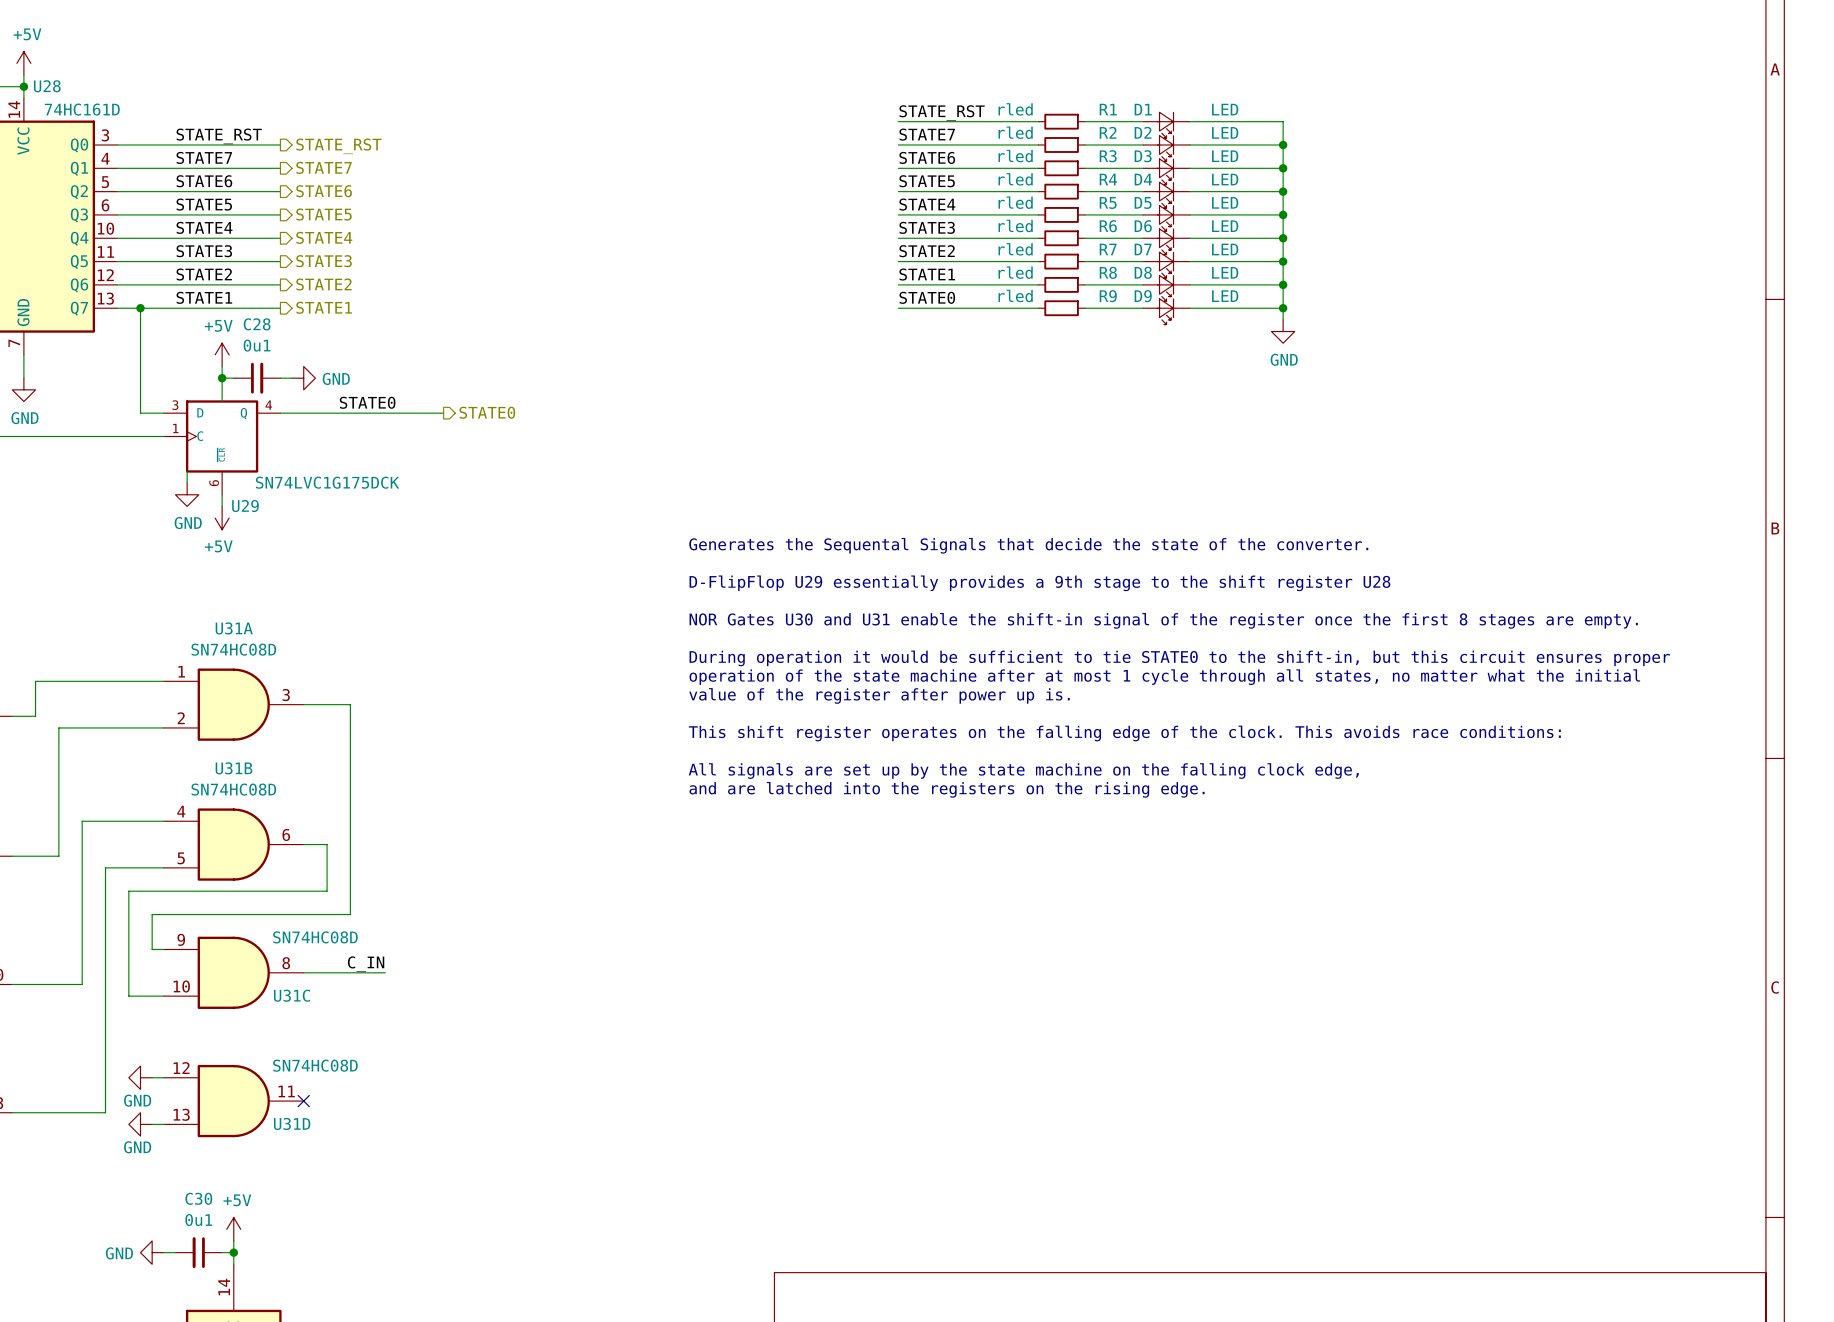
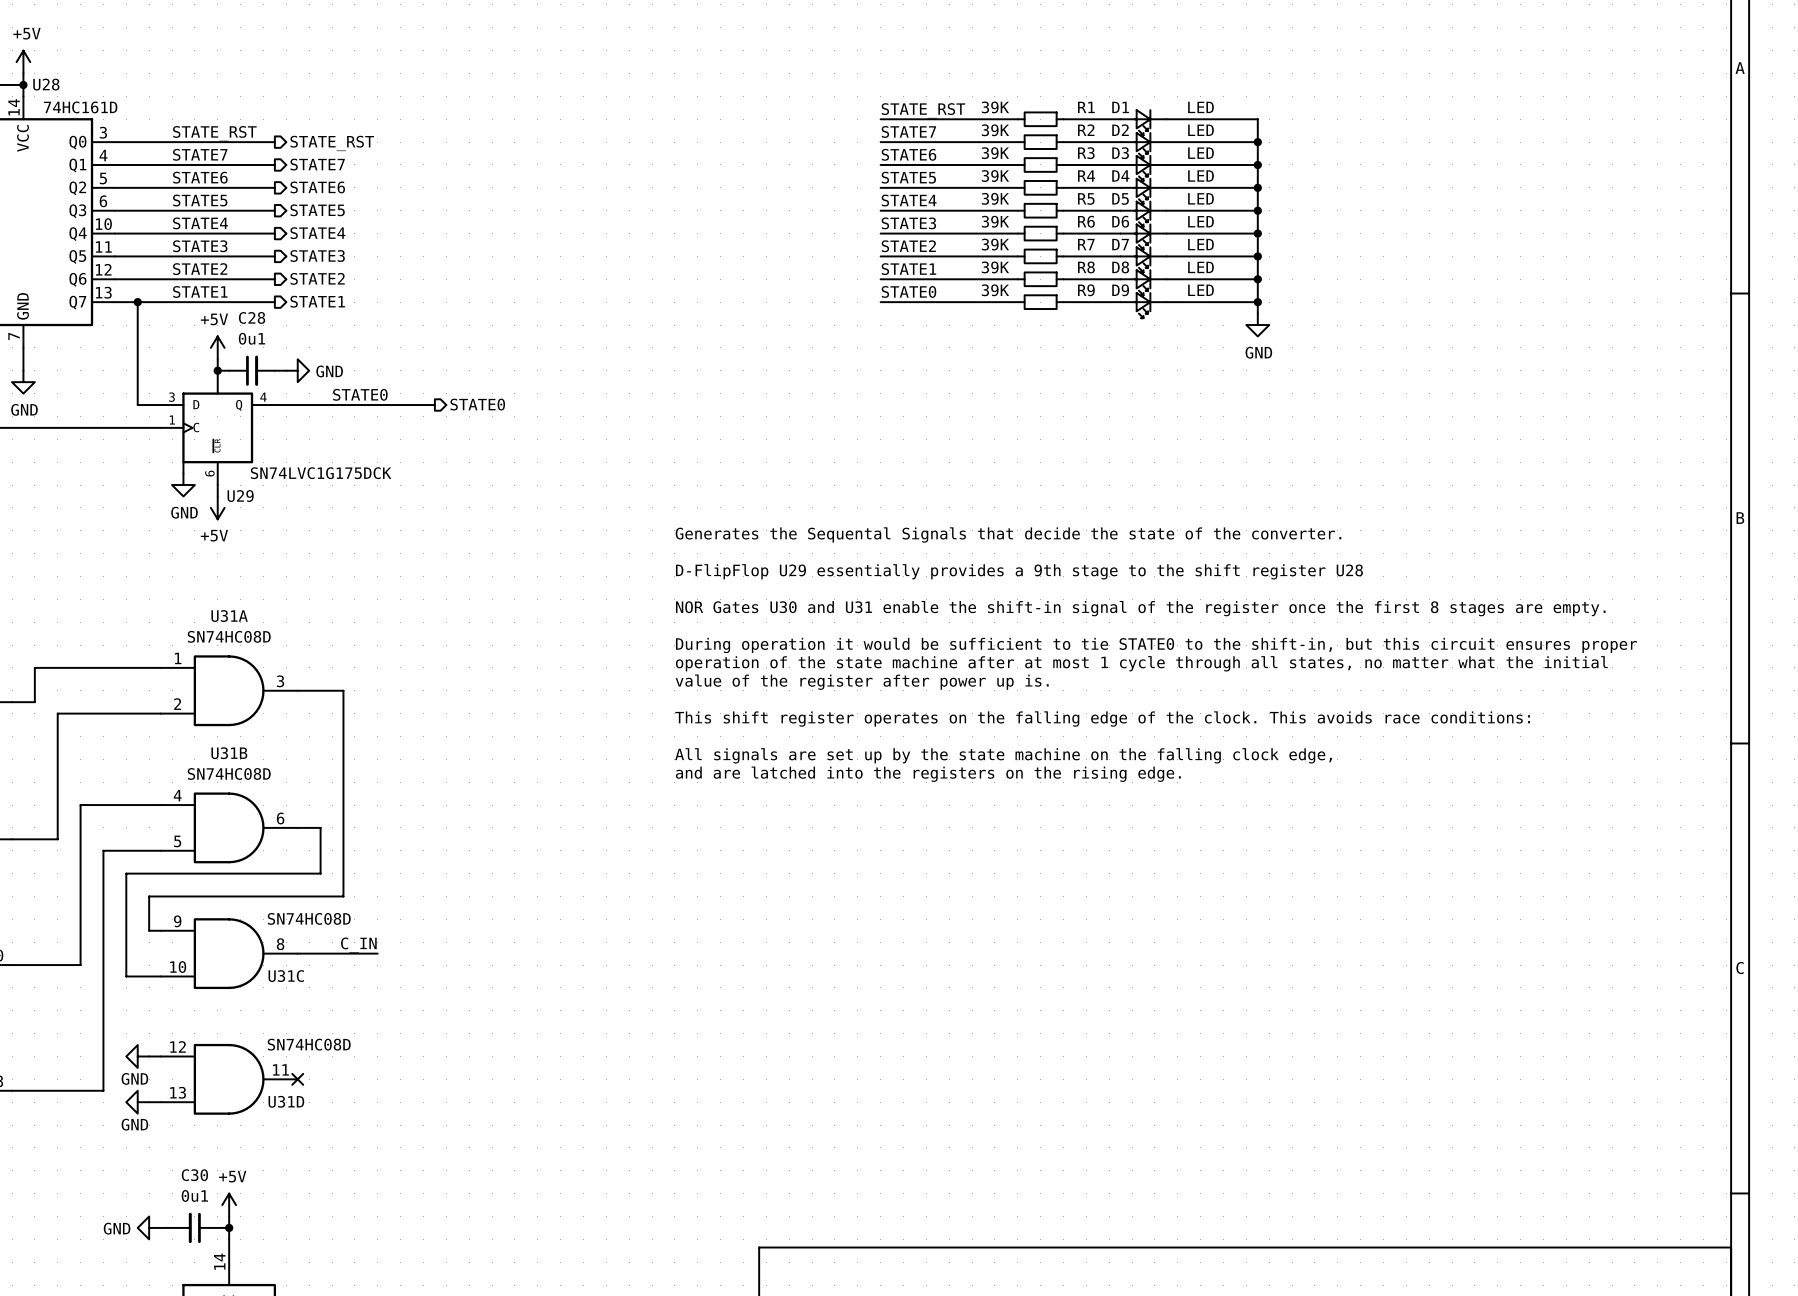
R1 value: rled (1015, 109) -> 39K (995, 107)
R2 value: rled (1015, 132) -> 39K (995, 130)
R3 value: rled (1015, 156) -> 39K (995, 153)
R4 value: rled (1015, 179) -> 39K (995, 176)
R5 value: rled (1015, 202) -> 39K (995, 198)
R6 value: rled (1015, 226) -> 39K (995, 221)
R7 value: rled (1015, 249) -> 39K (995, 244)
R8 value: rled (1015, 272) -> 39K (995, 267)
R9 value: rled (1015, 295) -> 39K (995, 290)

